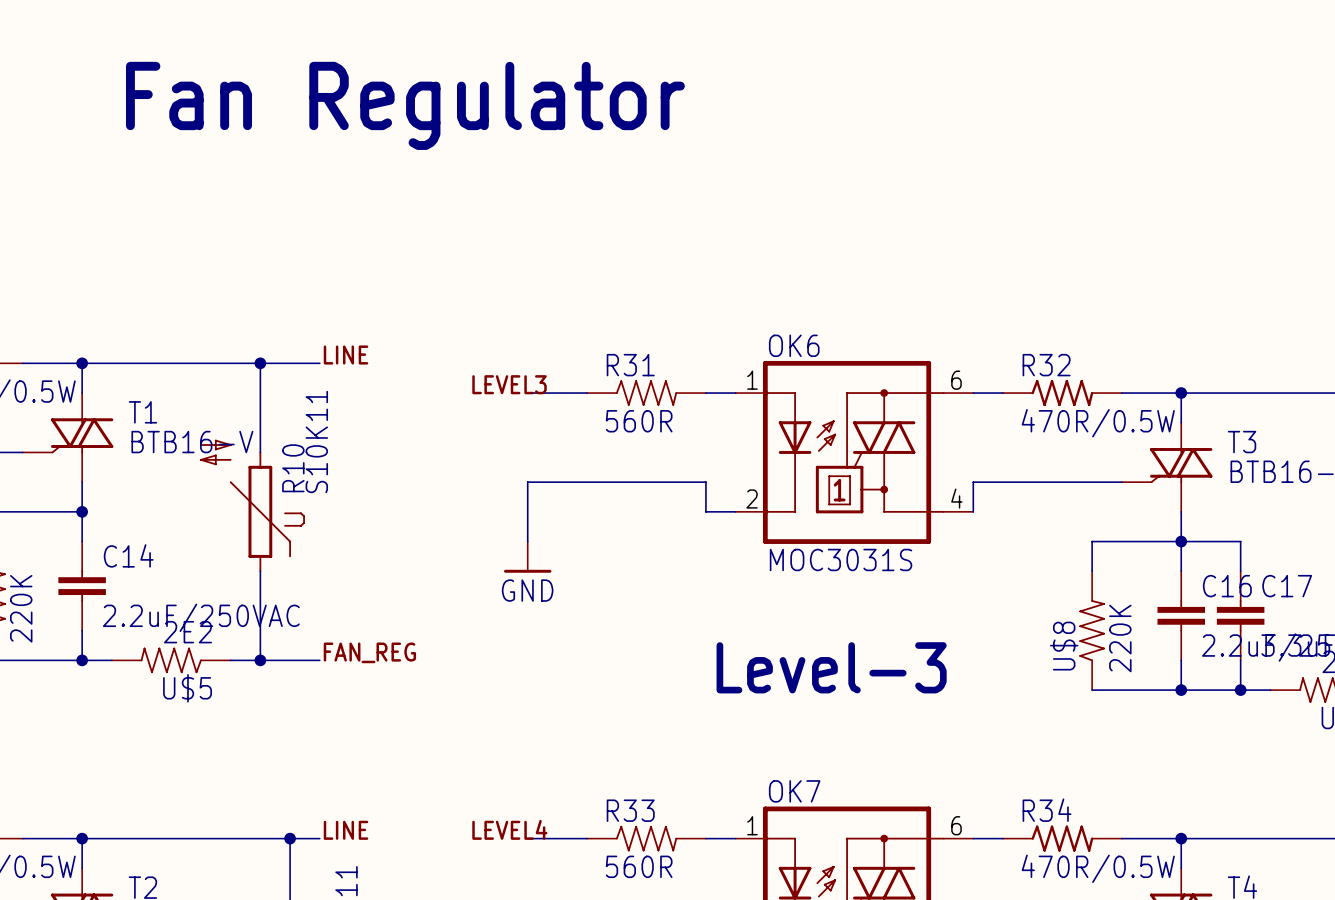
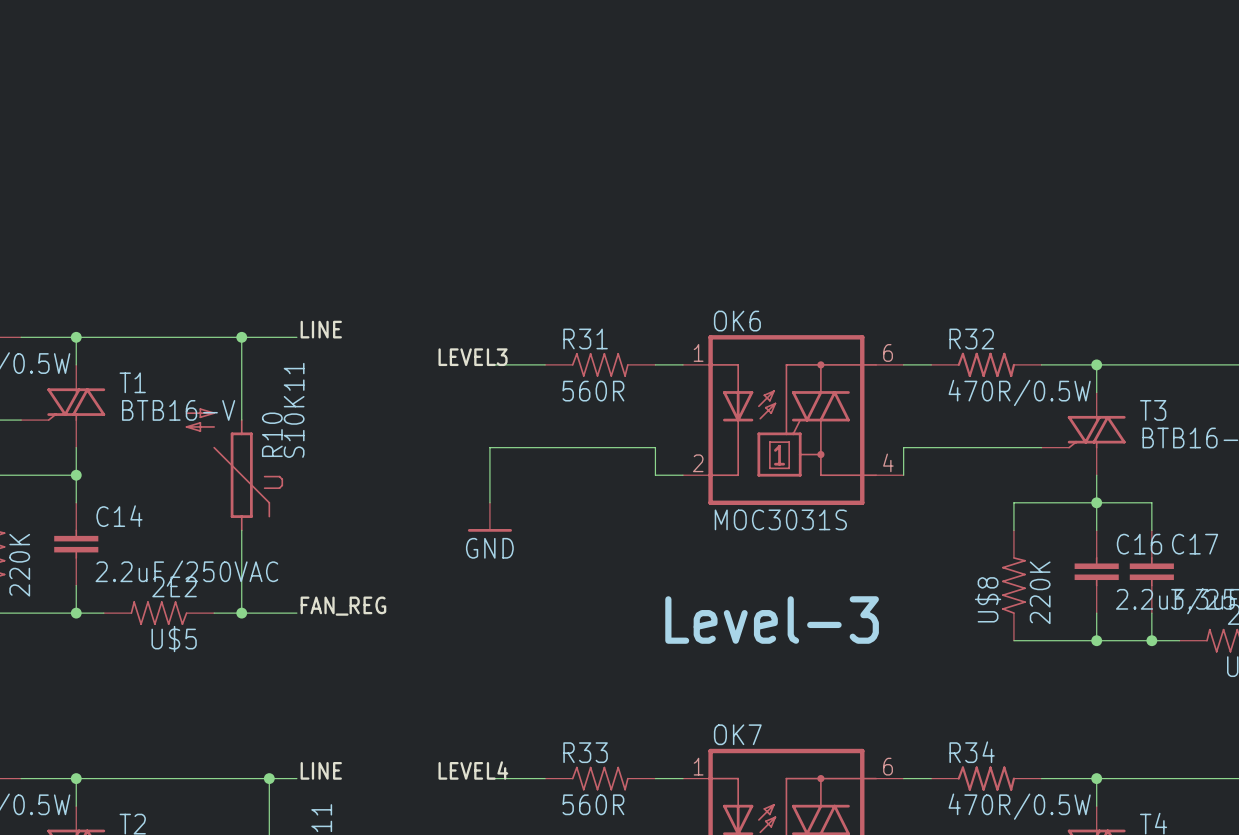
text: Fan Regulator (405, 105) -> none

